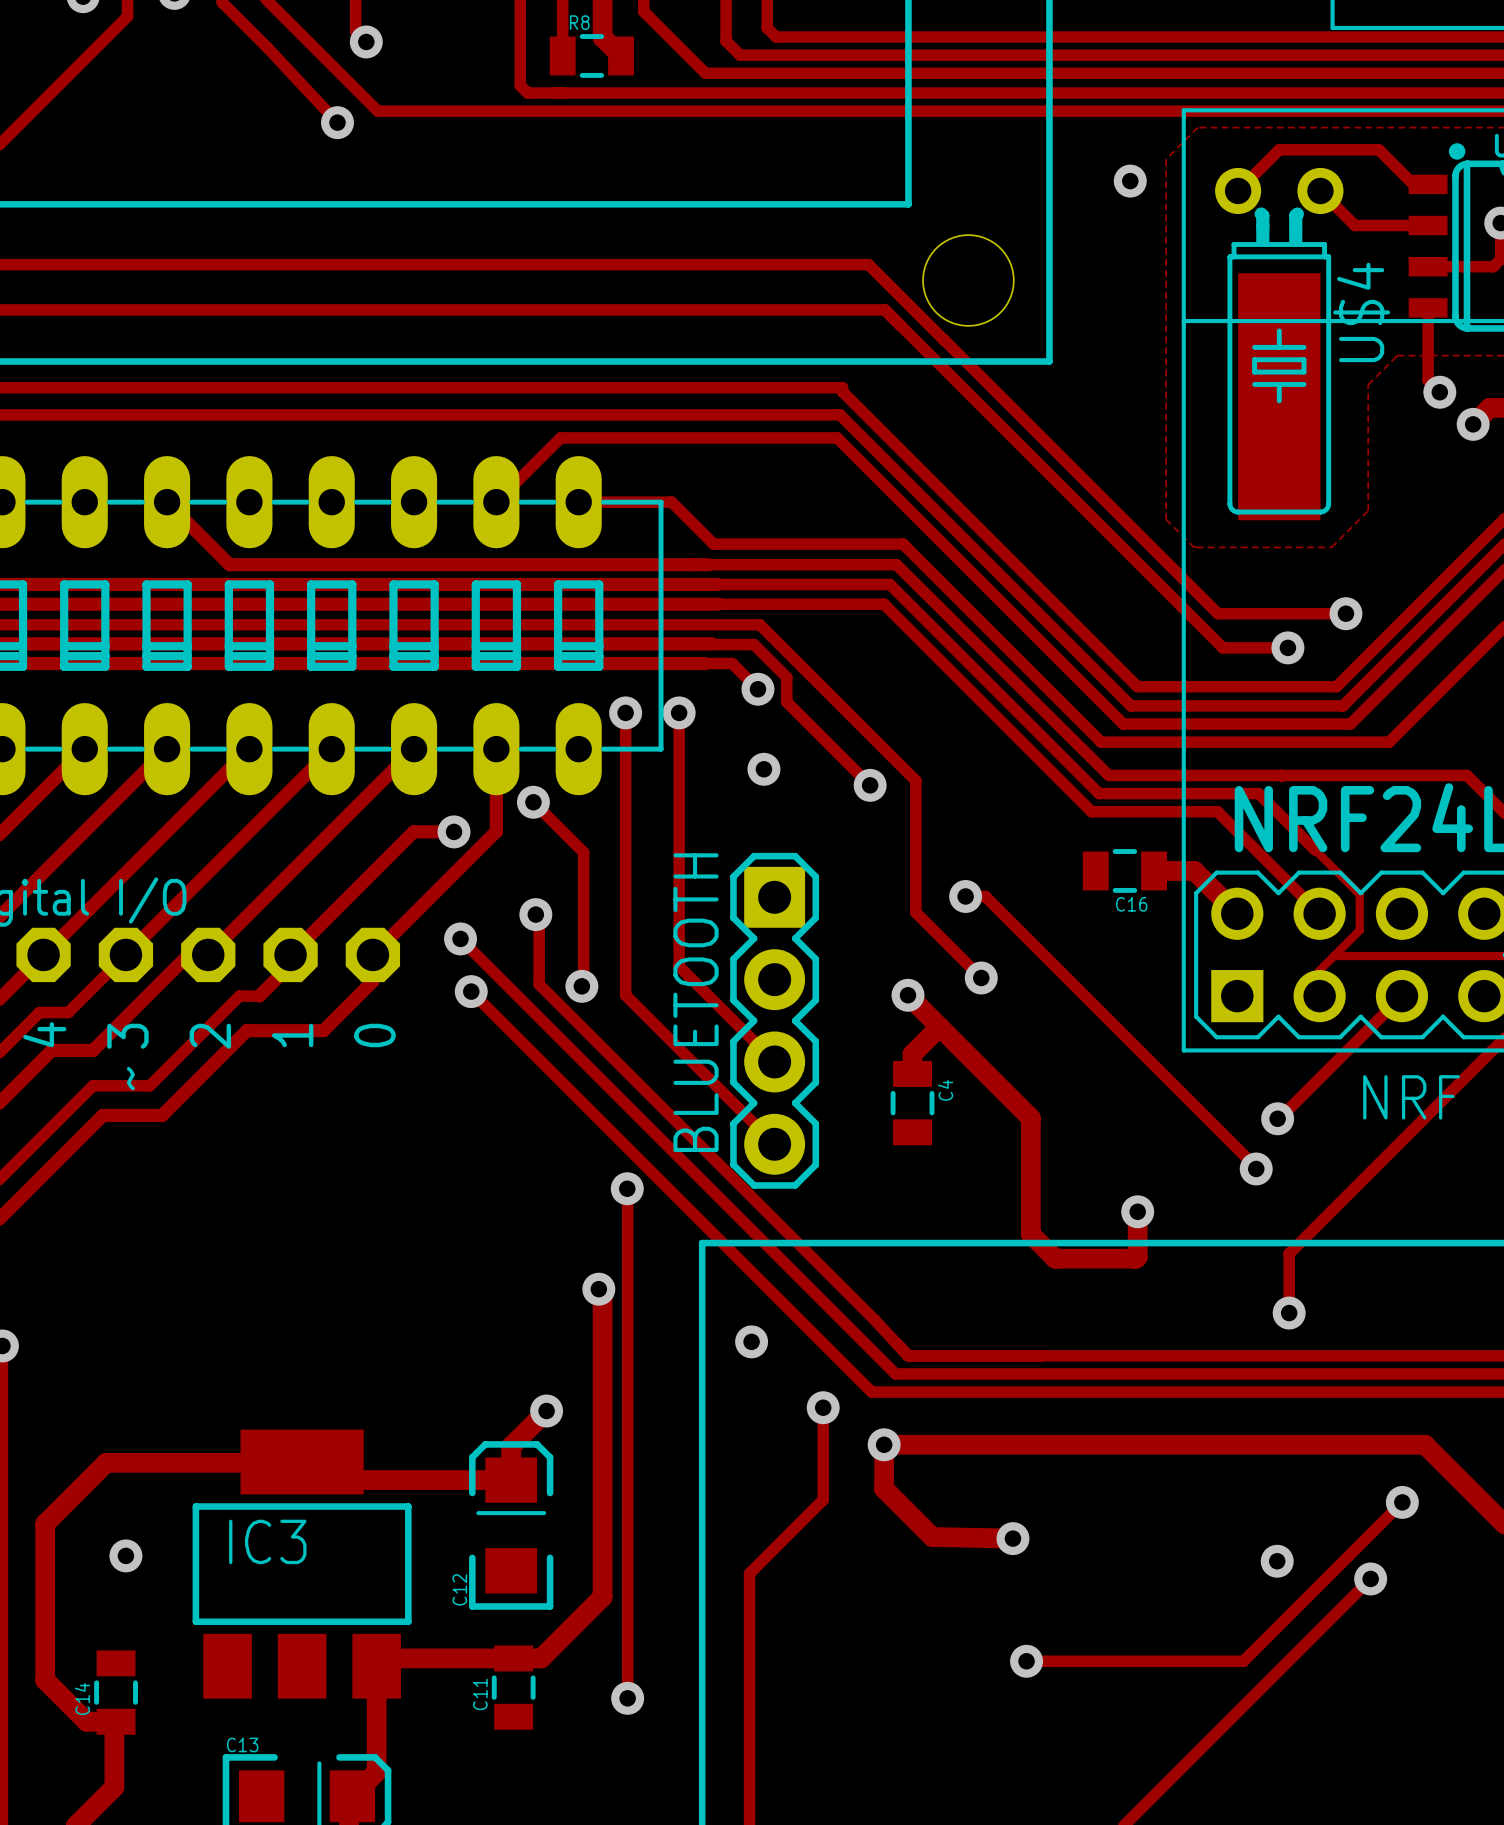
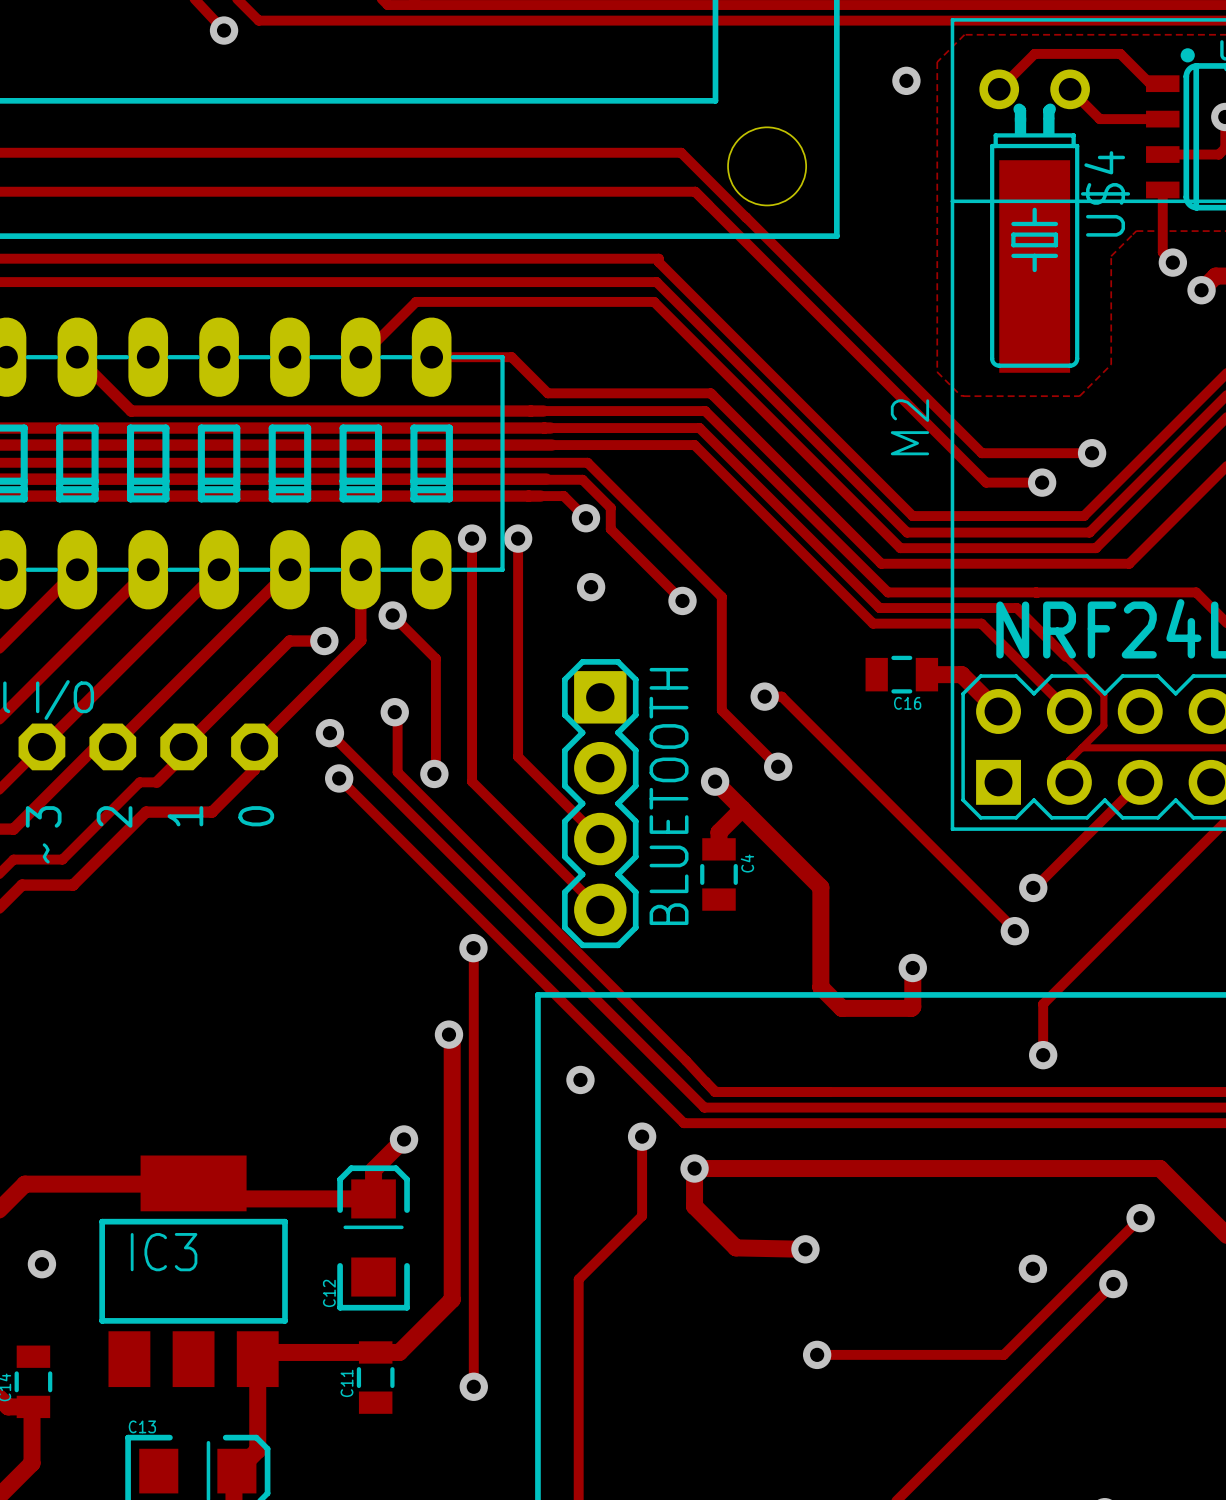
BLUETOOTH name position: BLUETOOTH (696, 1002) -> BLUETOOTH (669, 796)
NRF name: NRF (1411, 1097) -> M2 (909, 427)

